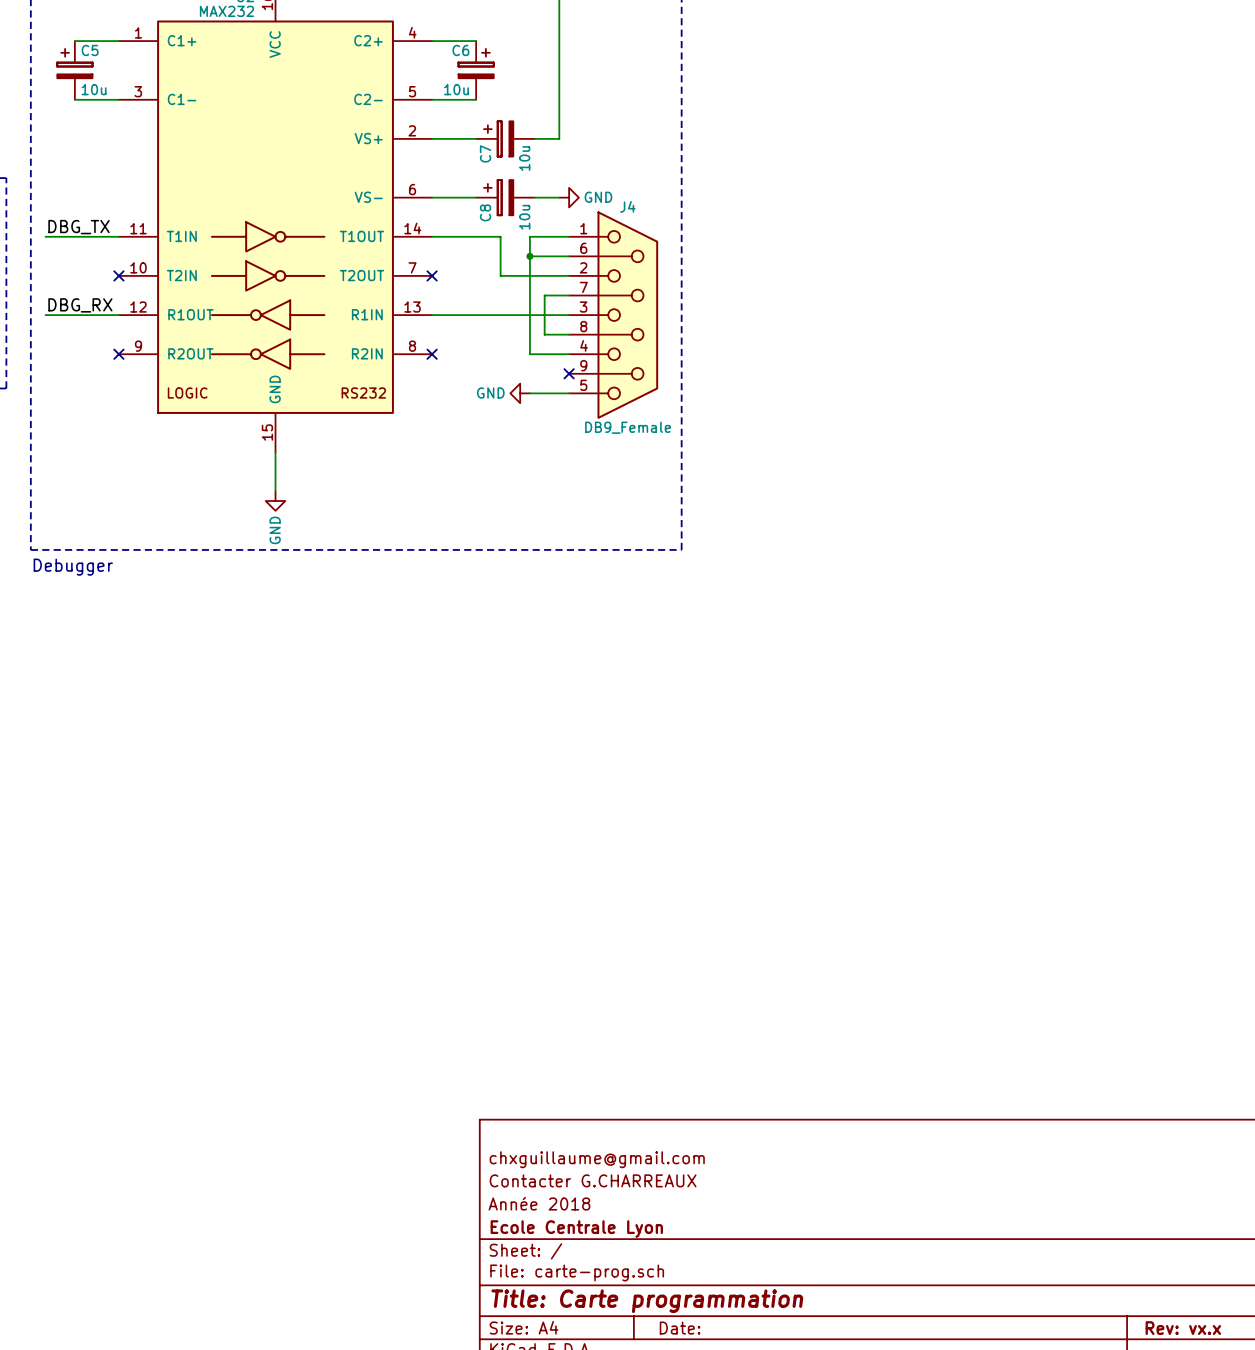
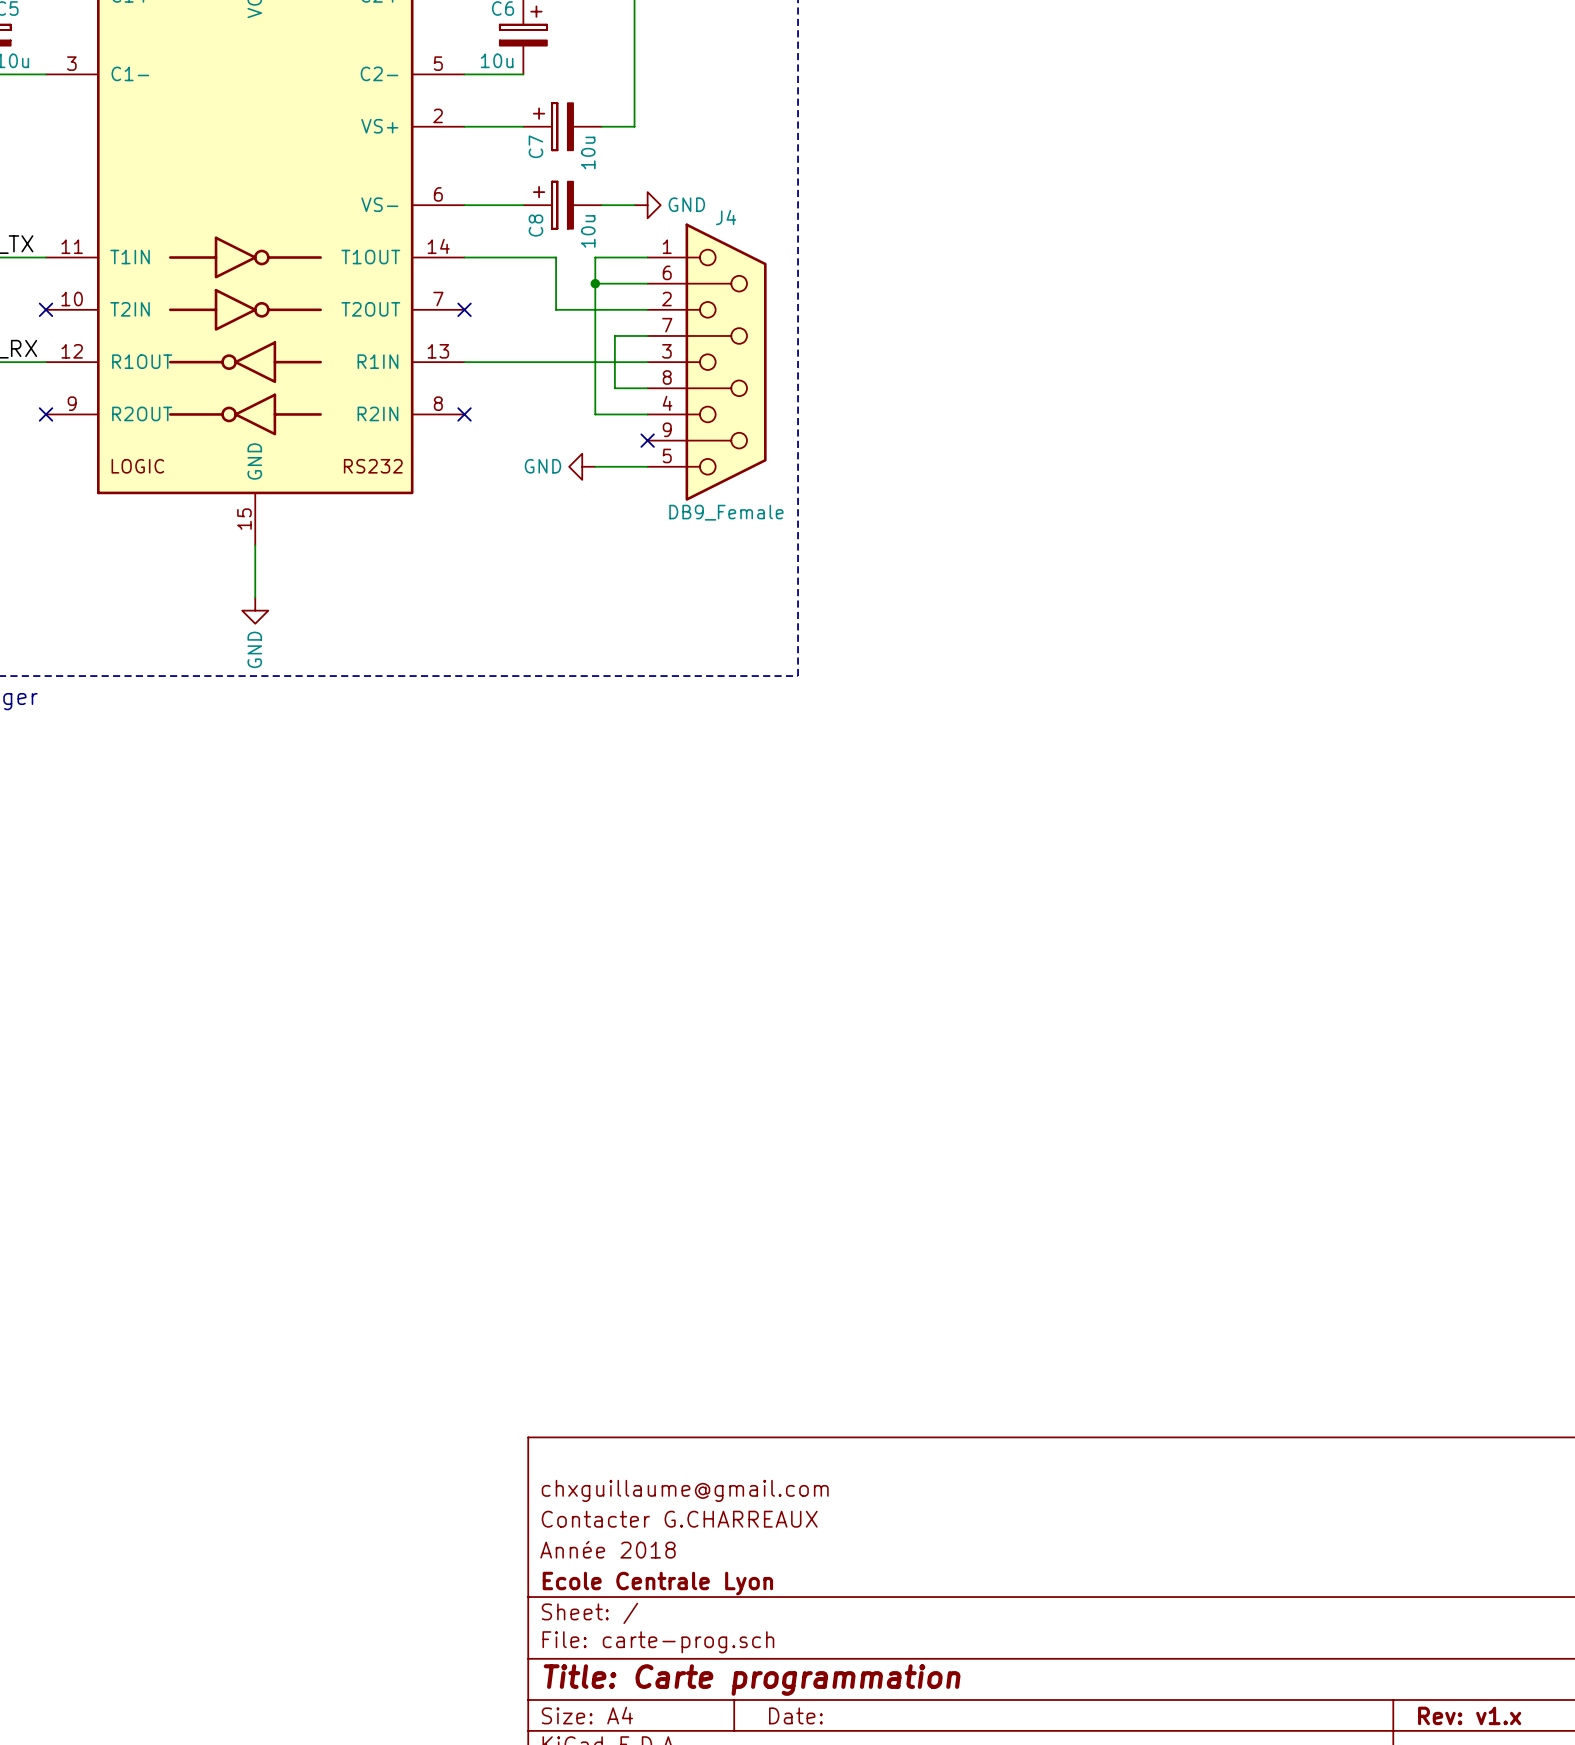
title block: Rev: vx.x (1183, 1328) -> Rev: v1.x (1469, 1715)

